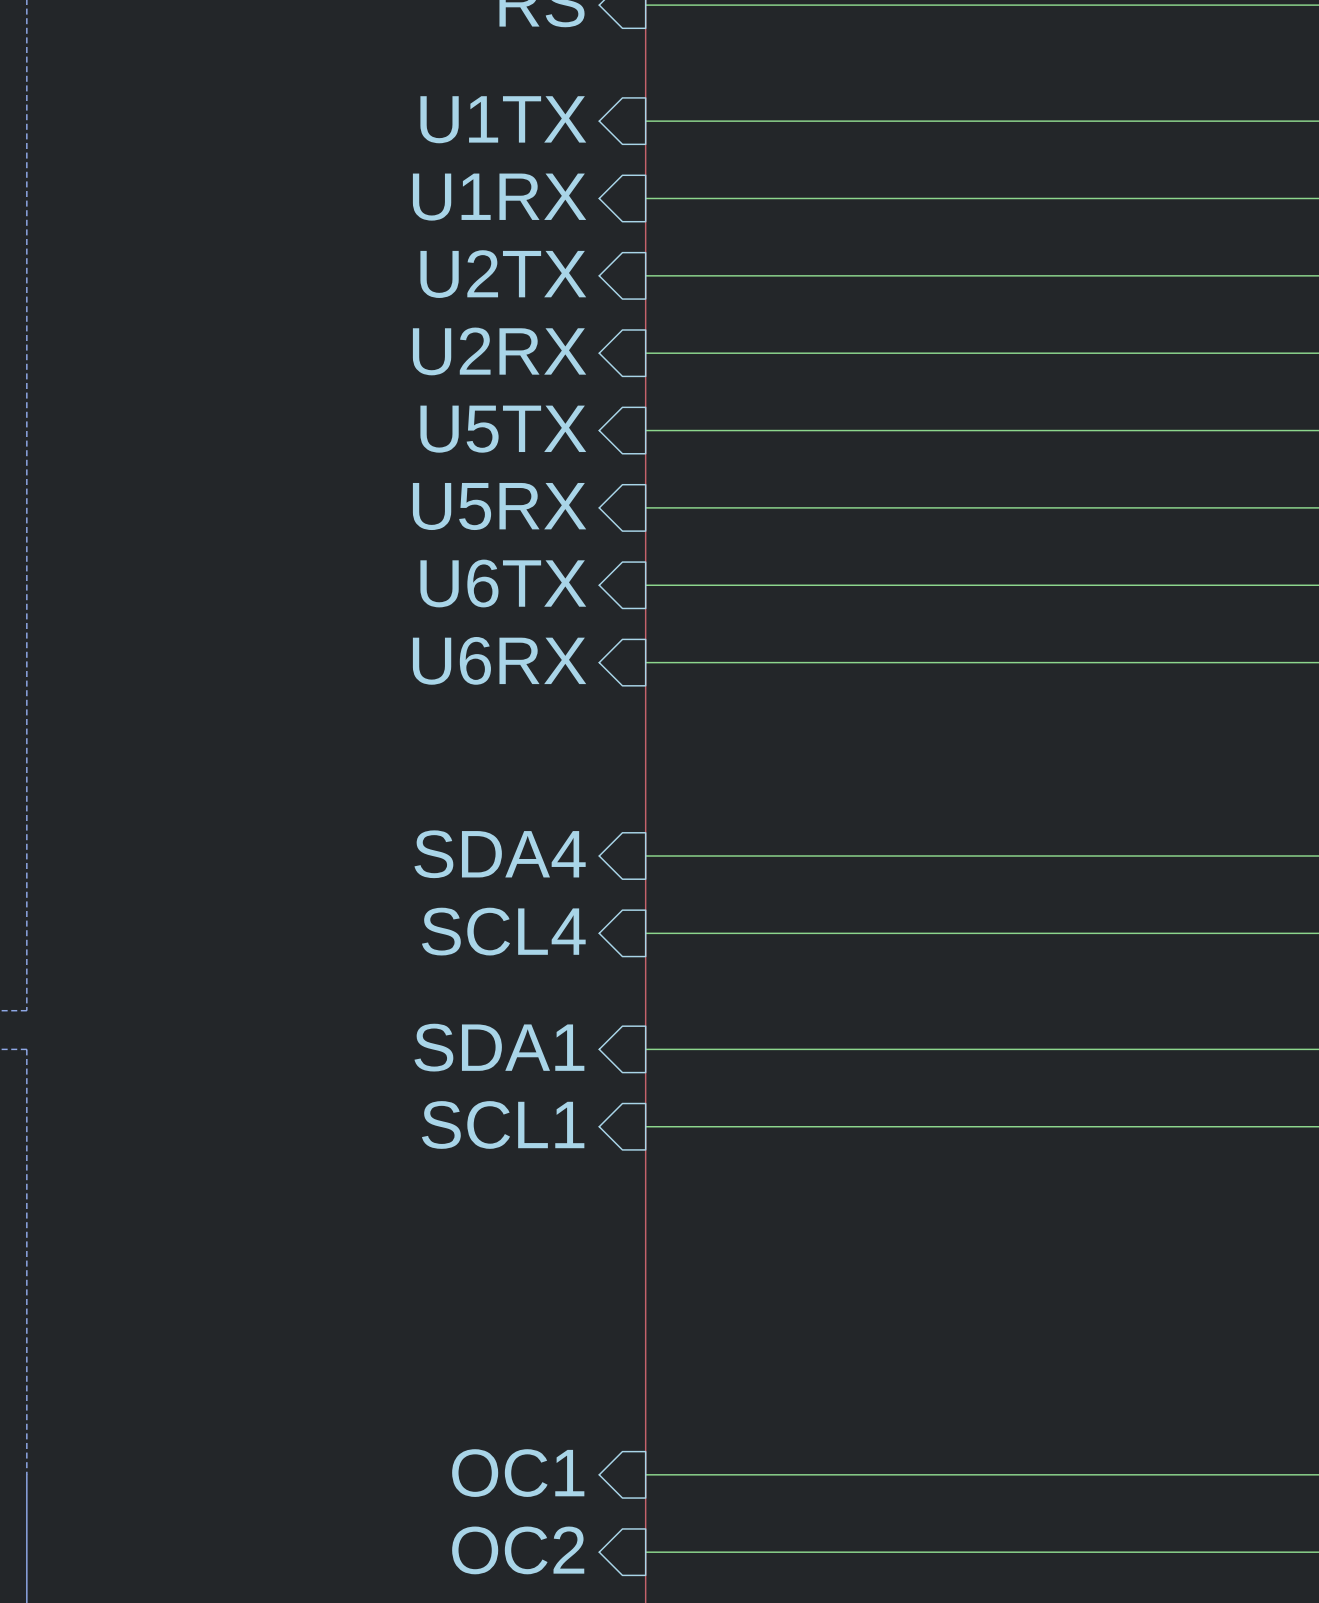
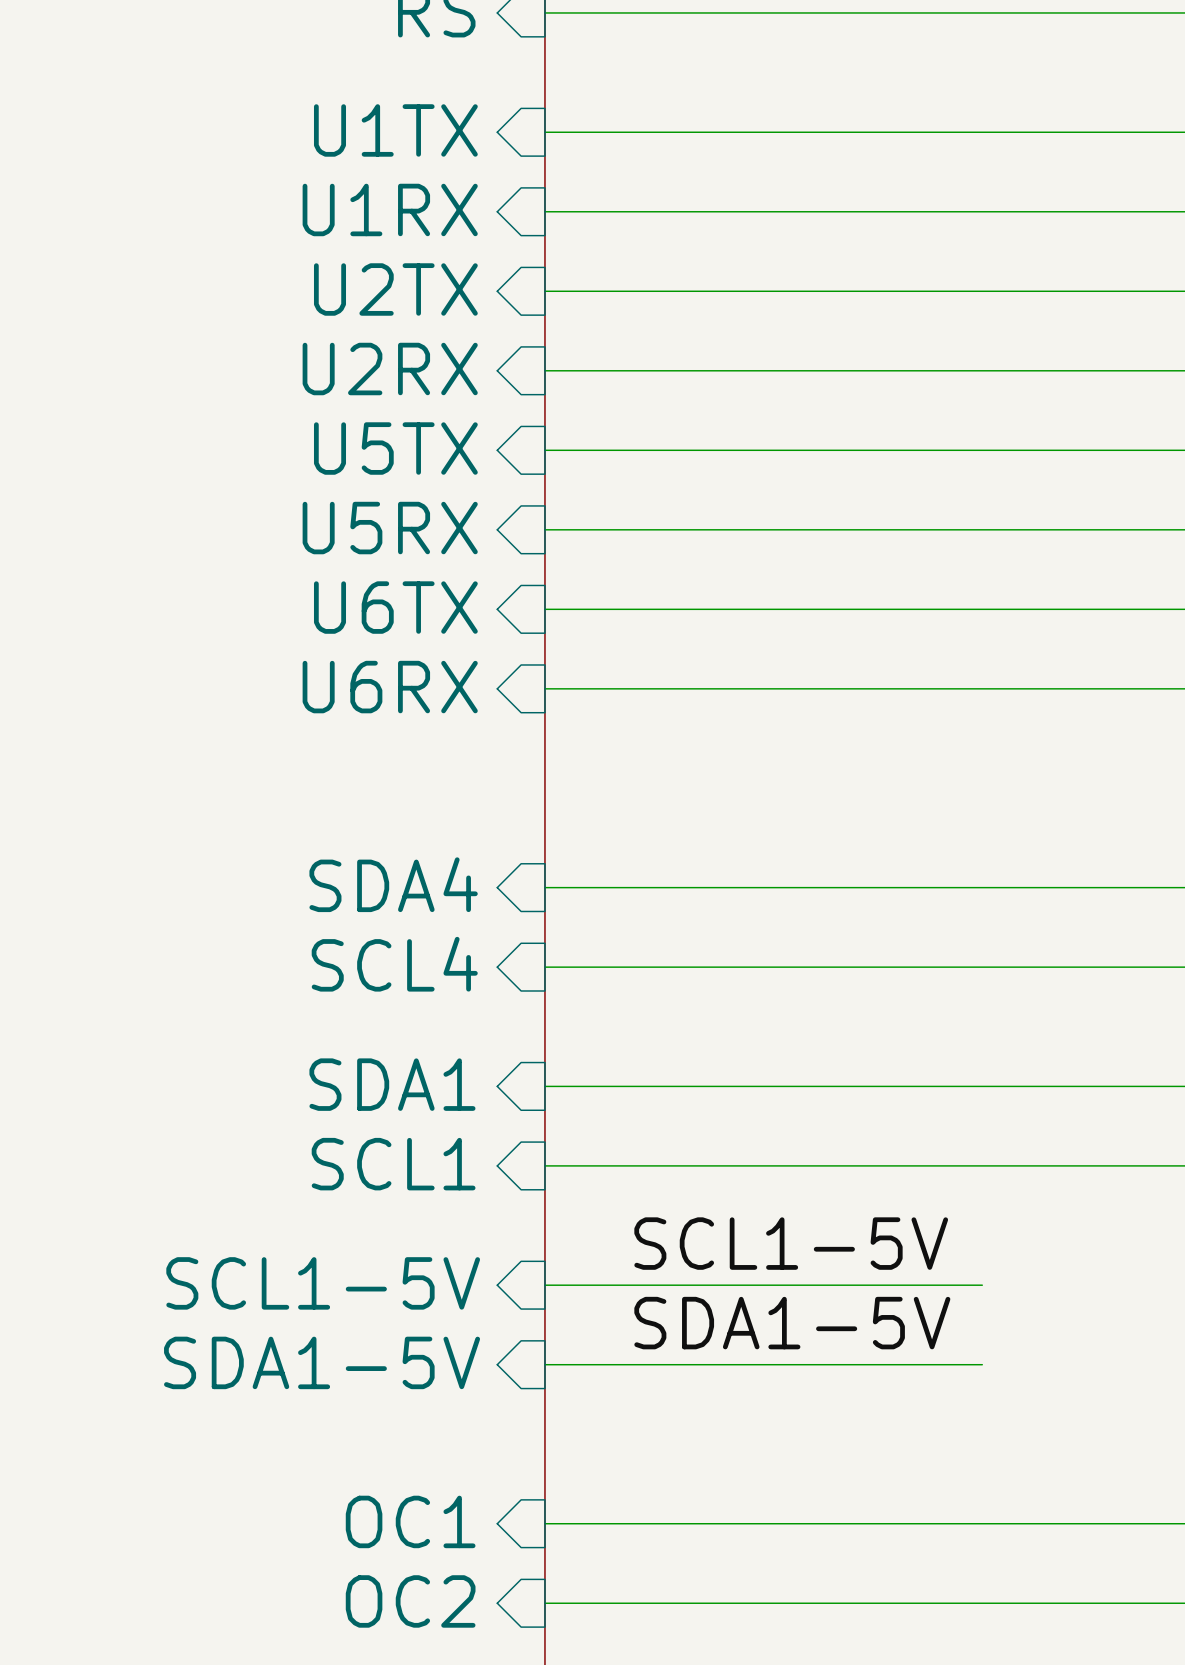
label: none -> SCL1-5V (791, 1243)
sheet pin: none -> SCL1-5V (323, 1283)
wire: none -> (544, 1285) (982, 1285)
label: none -> SDA1-5V (792, 1323)
sheet pin: none -> SDA1-5V (322, 1362)
wire: none -> (544, 1364) (982, 1364)

